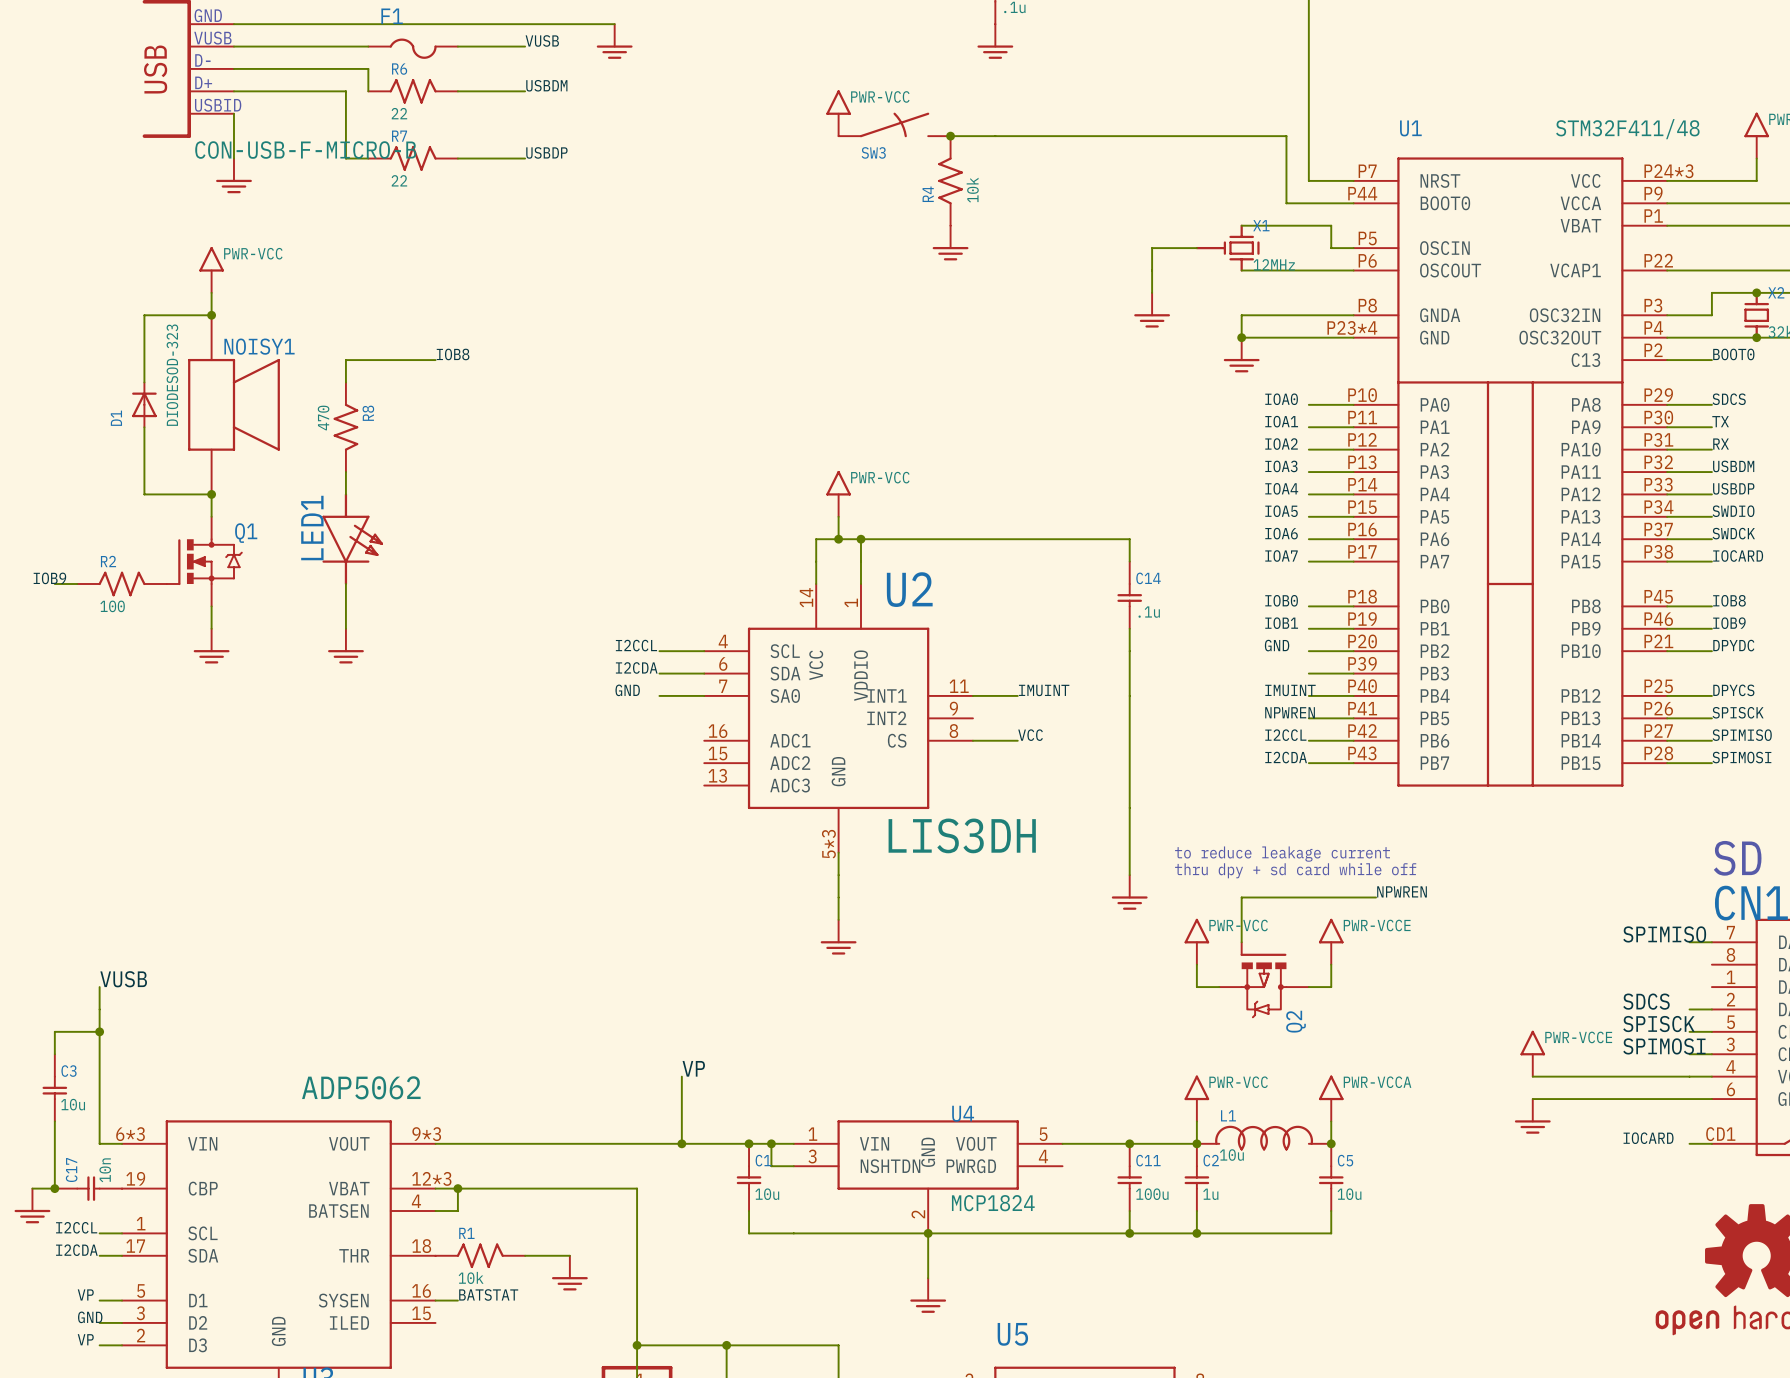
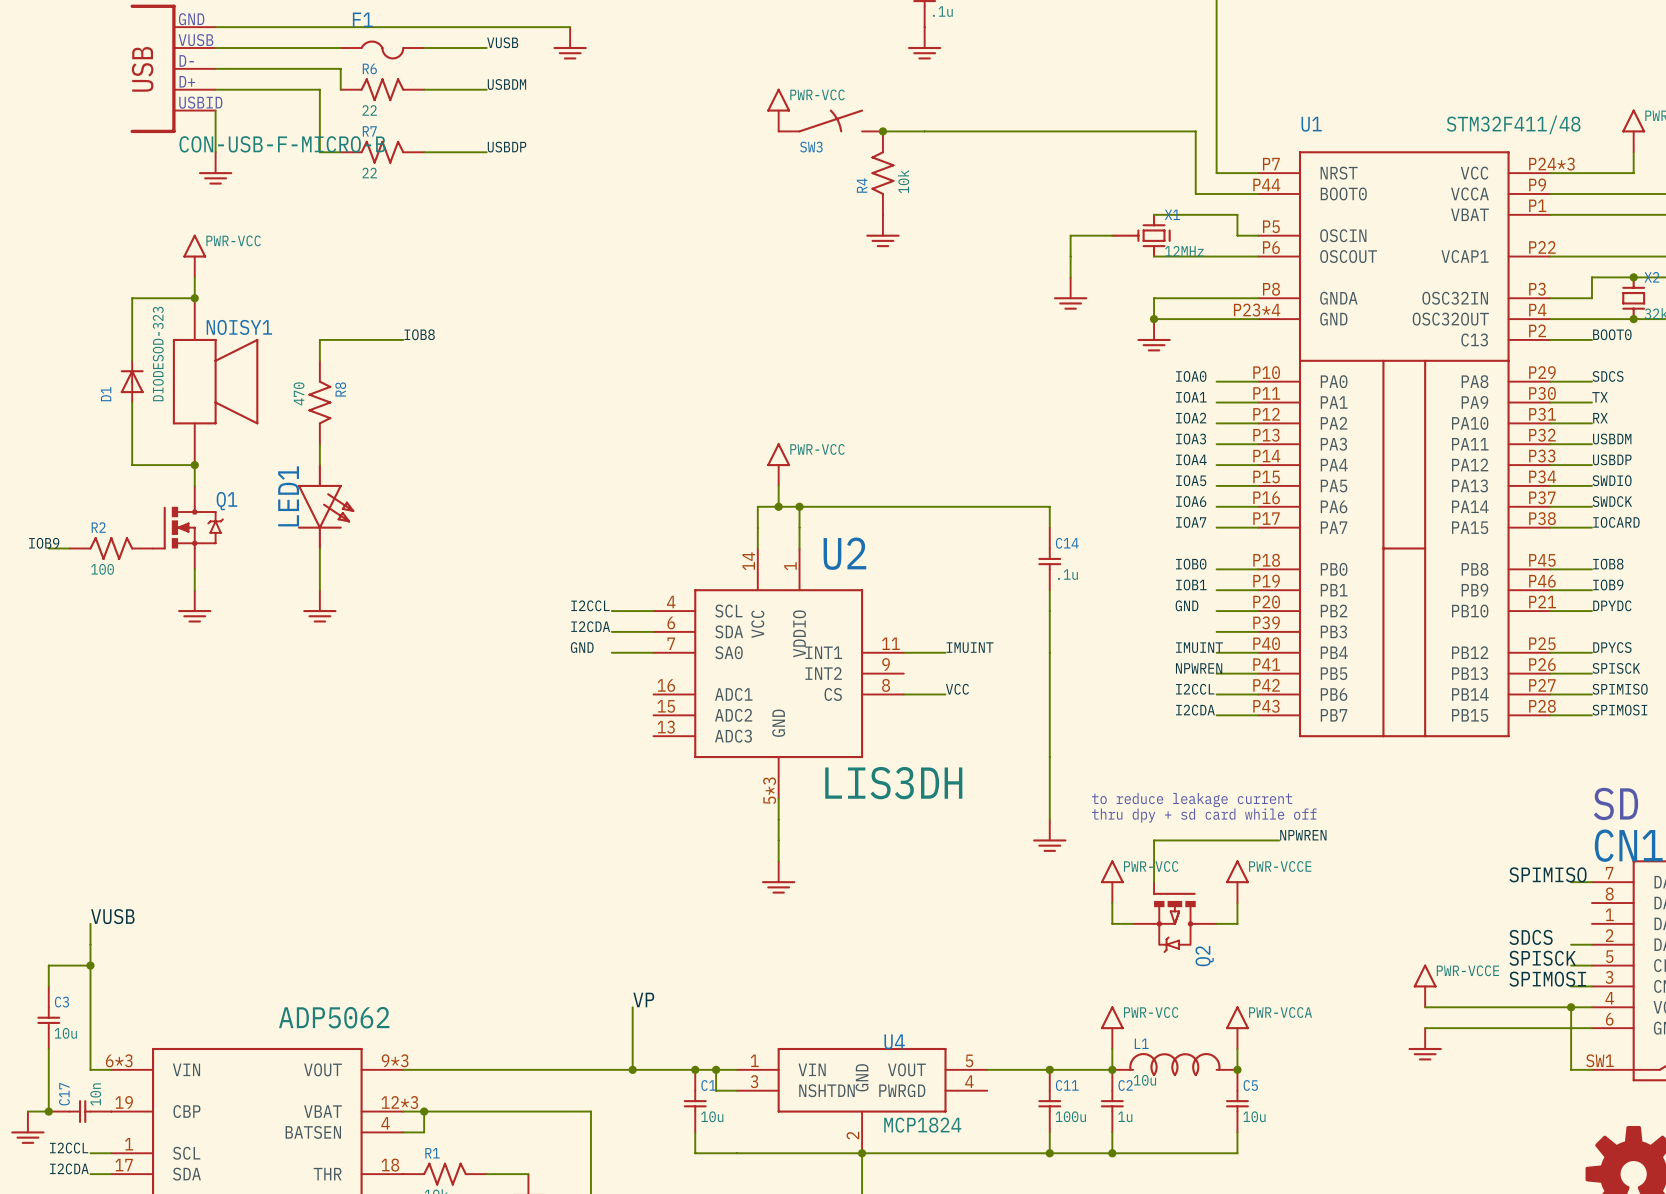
wire: none -> (1571, 1007) (1571, 1069)
junction: none -> (1571, 1007)
CN1 pin number: CD1 (1720, 1134) -> SW1 (1600, 1060)
label: IOCARD (1648, 1138) -> none

